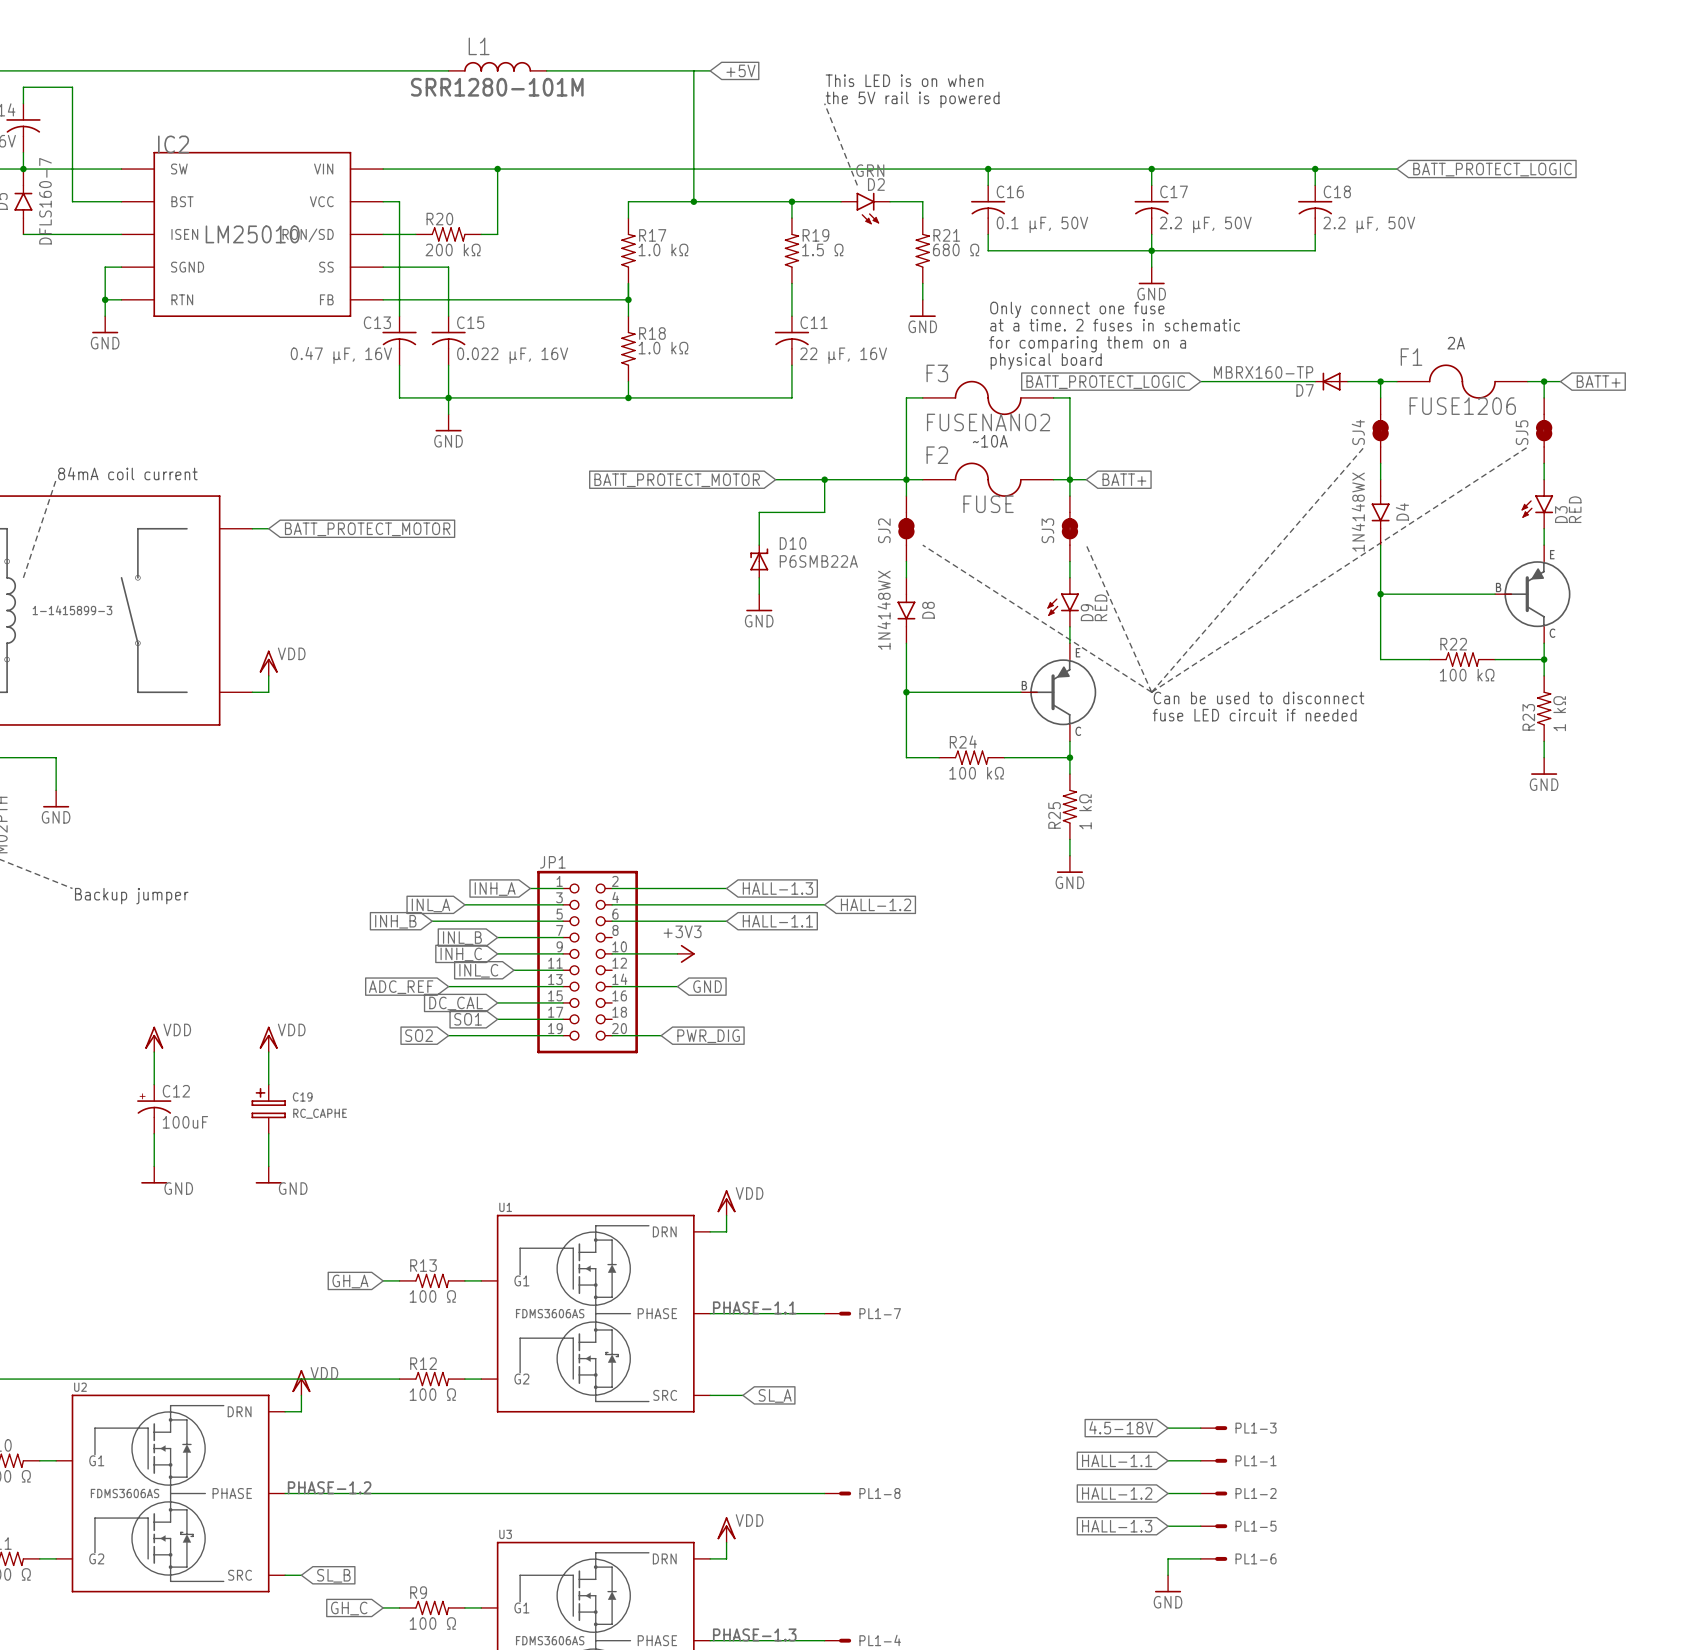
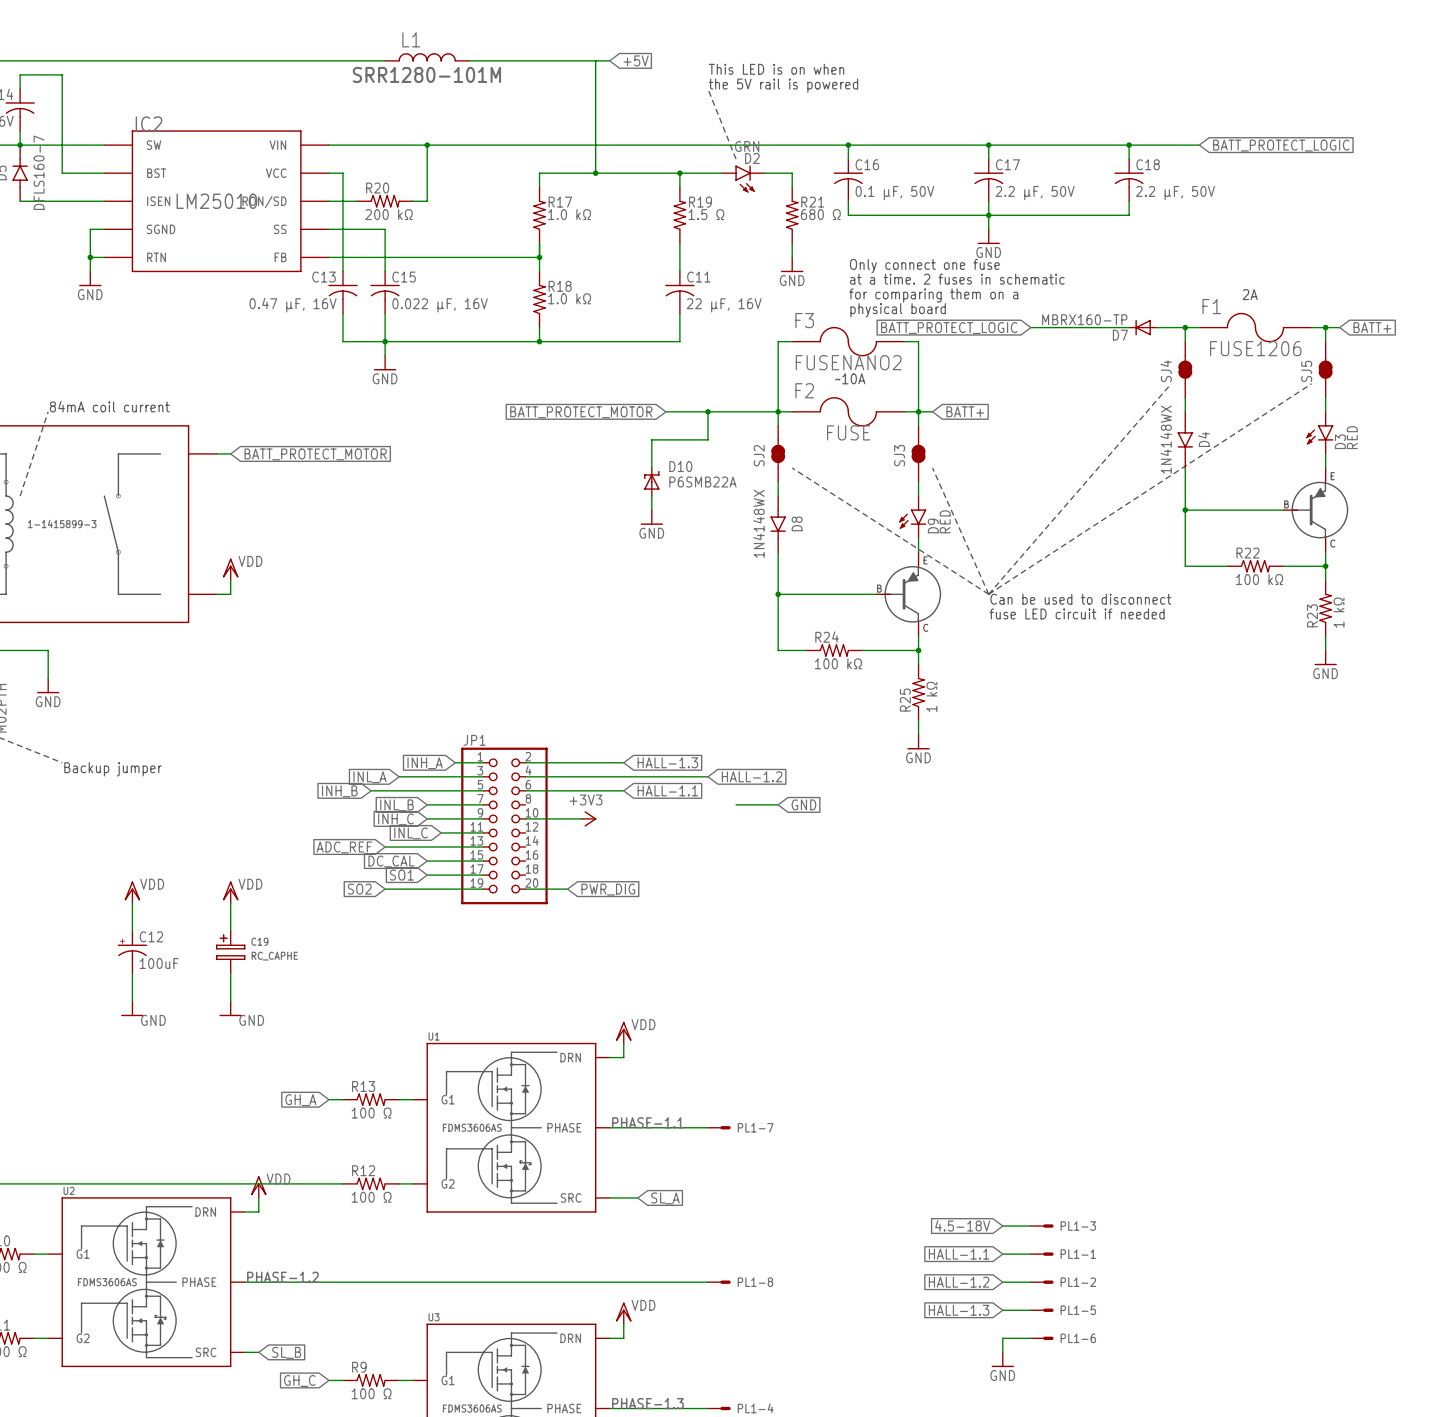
wire: none -> (736, 804) (778, 804)
global label: none -> GND (803, 804)
wire: (612, 986) (677, 986) -> none
global label: GND (707, 986) -> none

